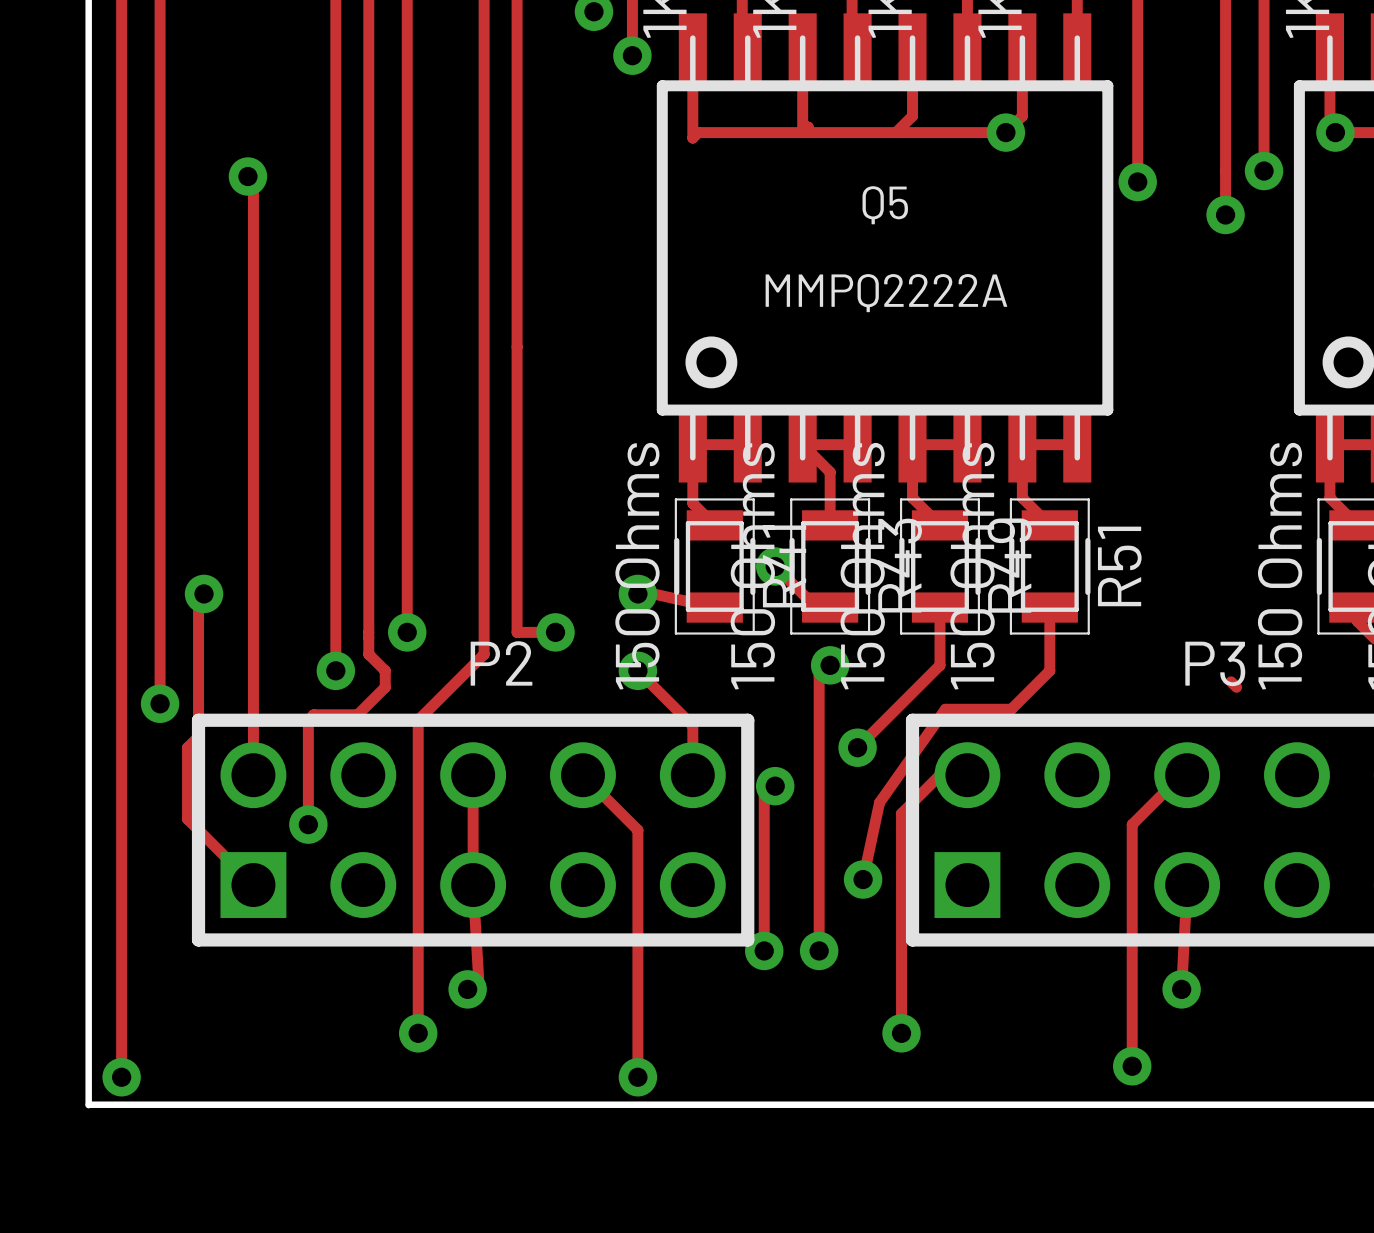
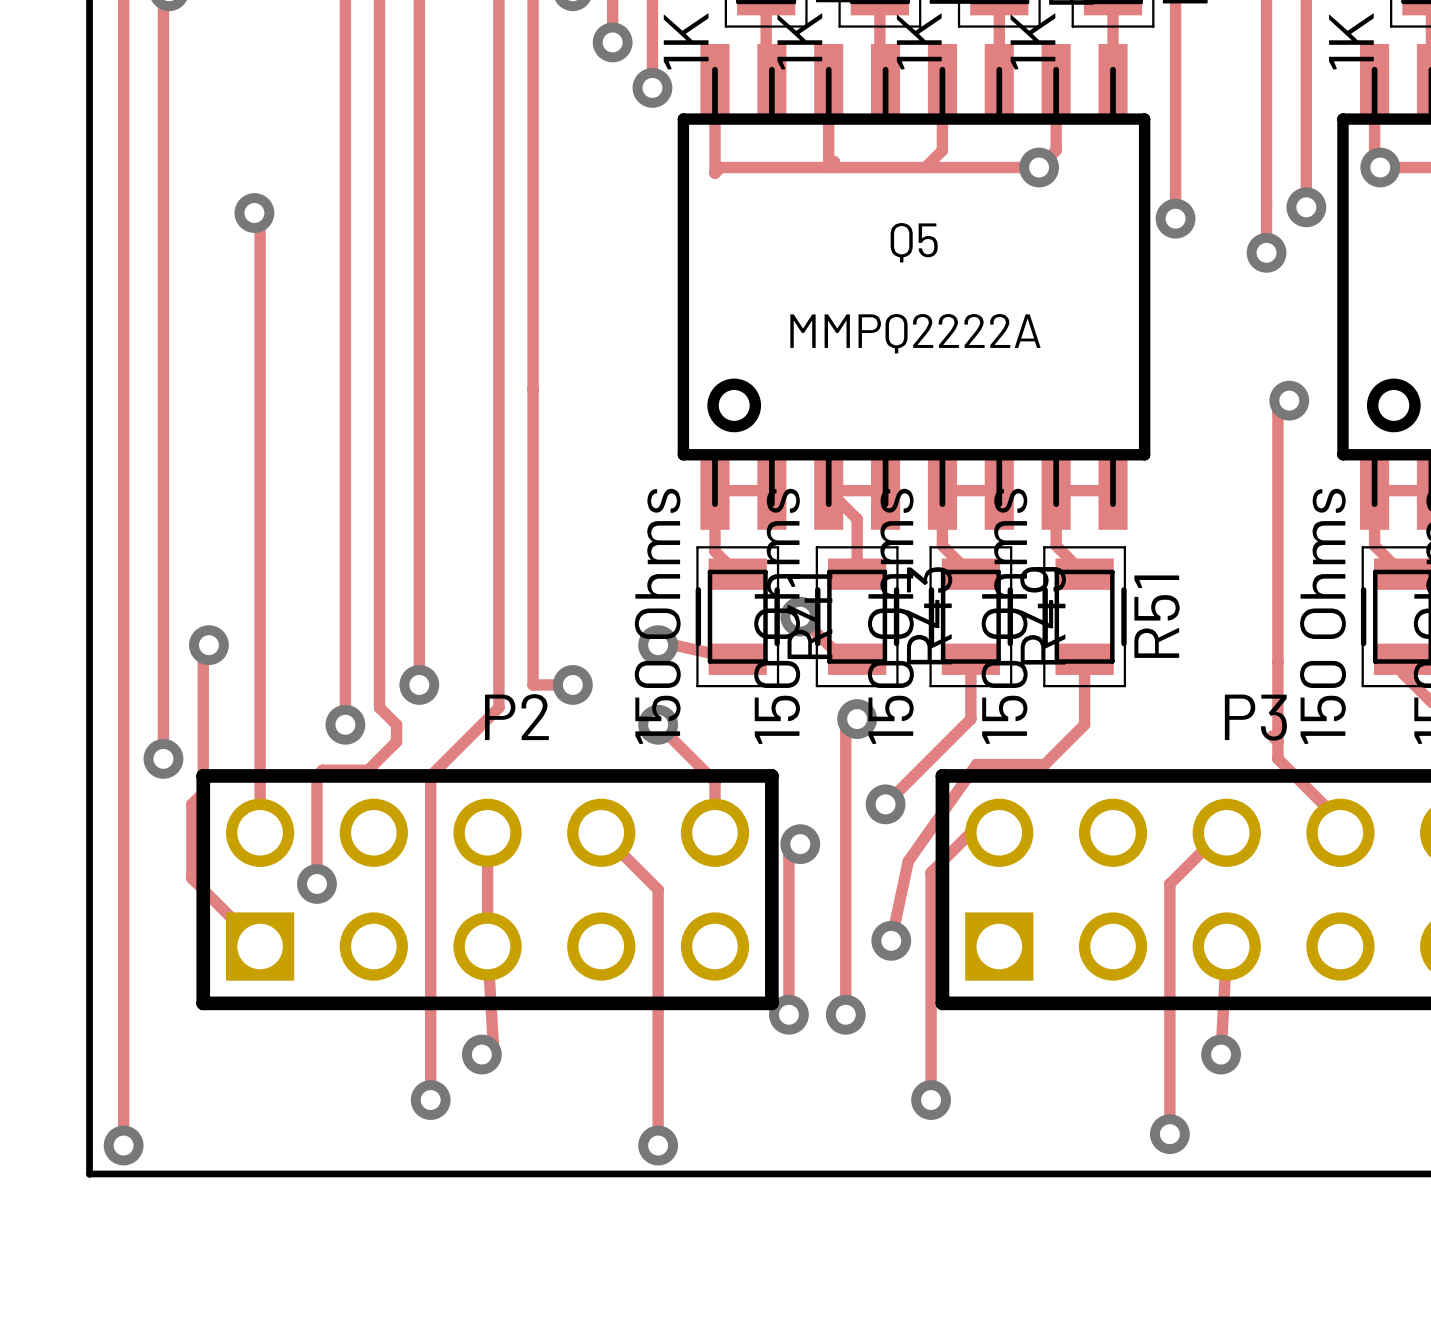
track: none -> (1289, 400) (1277, 412) (1277, 758) (1340, 821) (1340, 832)
via: none -> (1289, 400)

